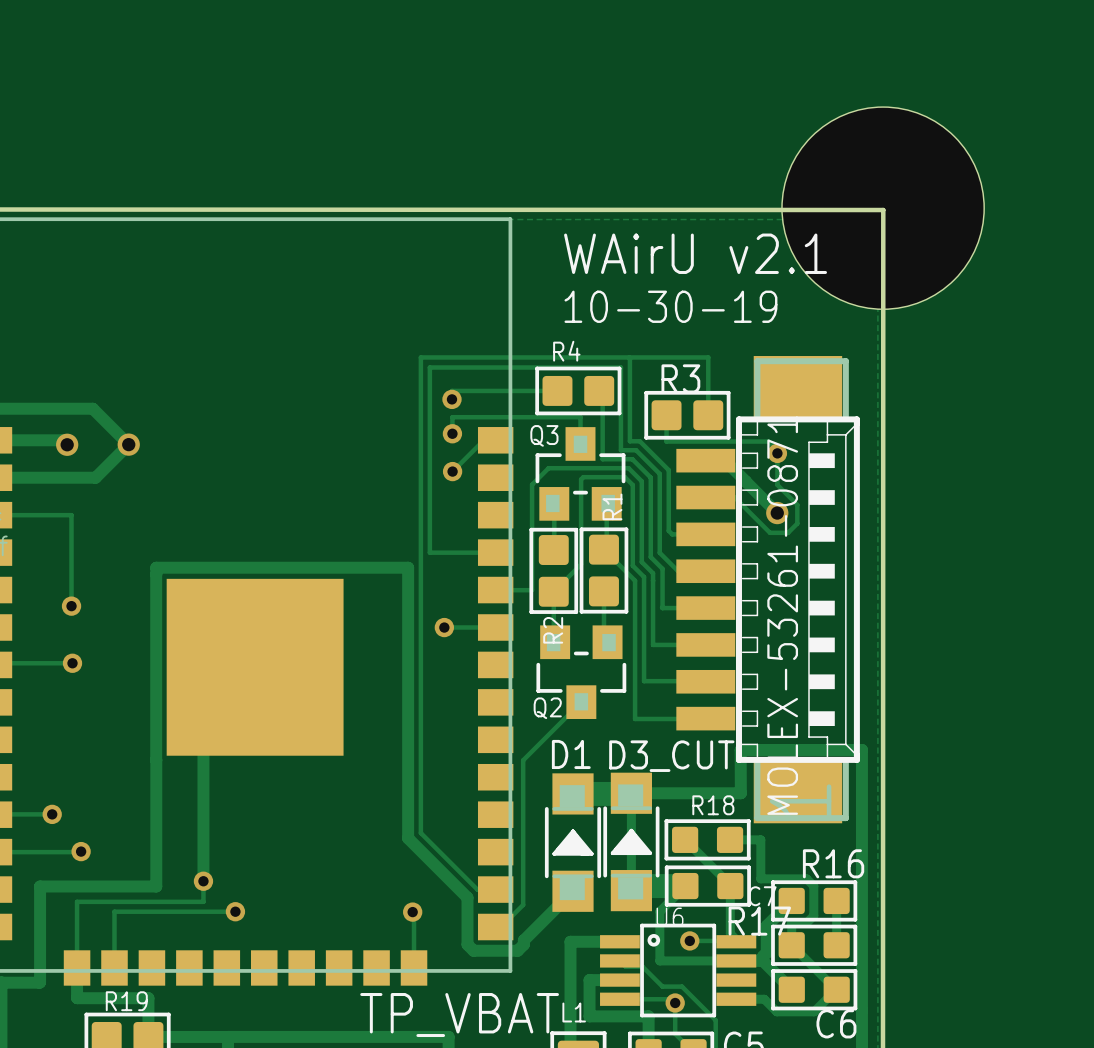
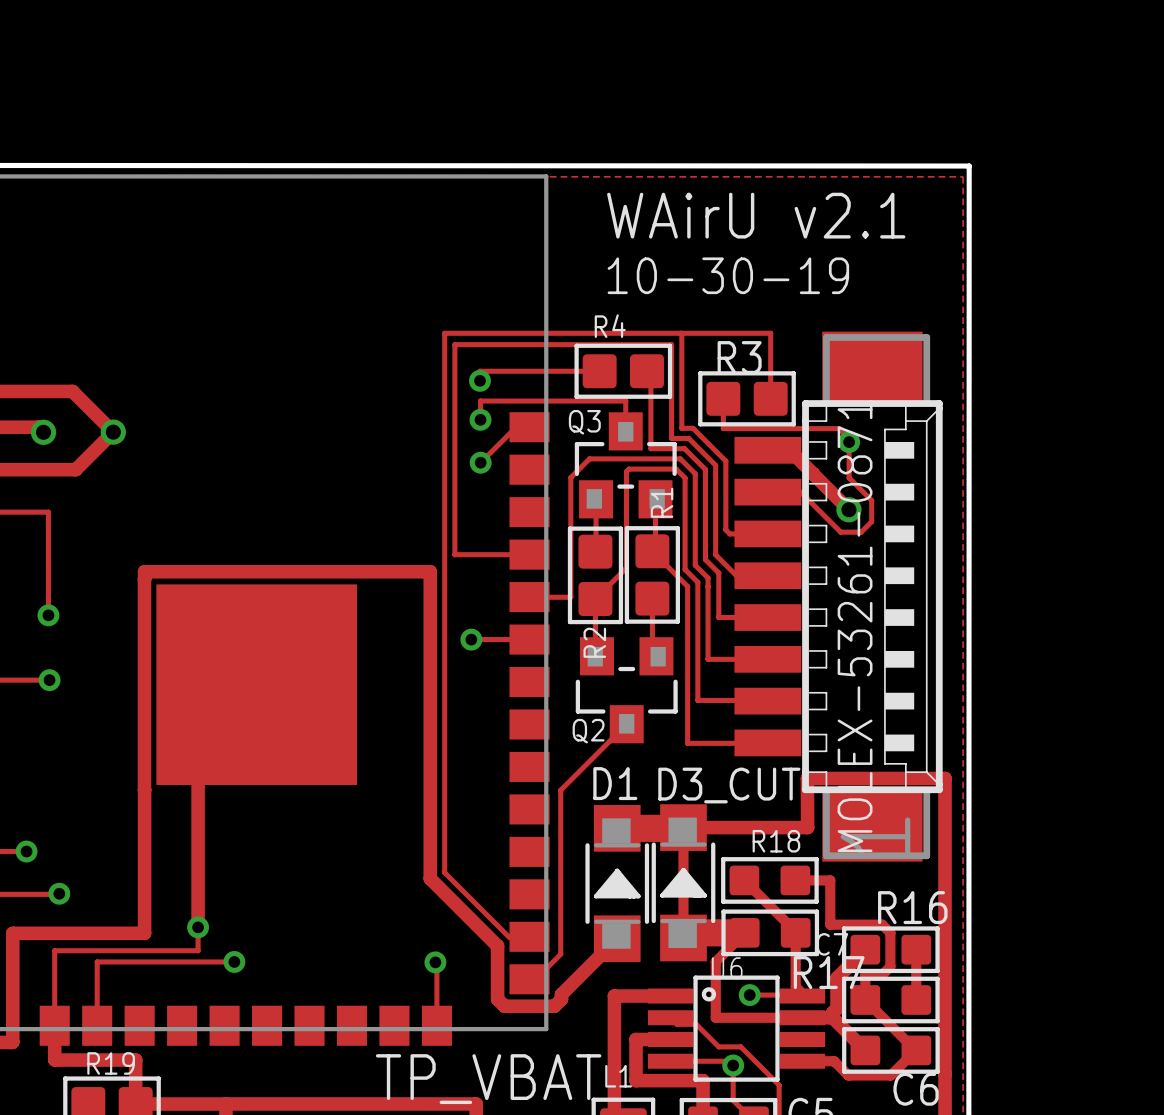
hole: (883, 208) -> none

